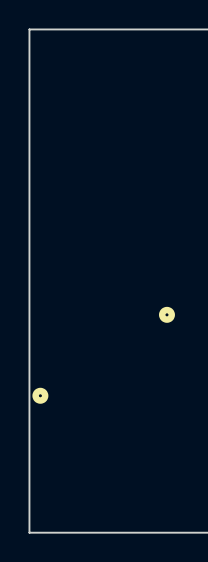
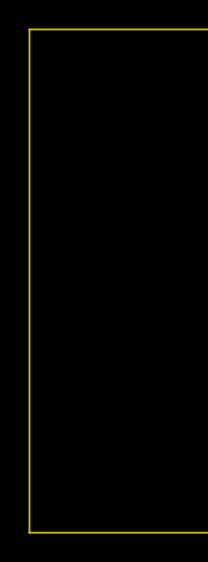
part: (166, 314) -> none
part: (40, 395) -> none

